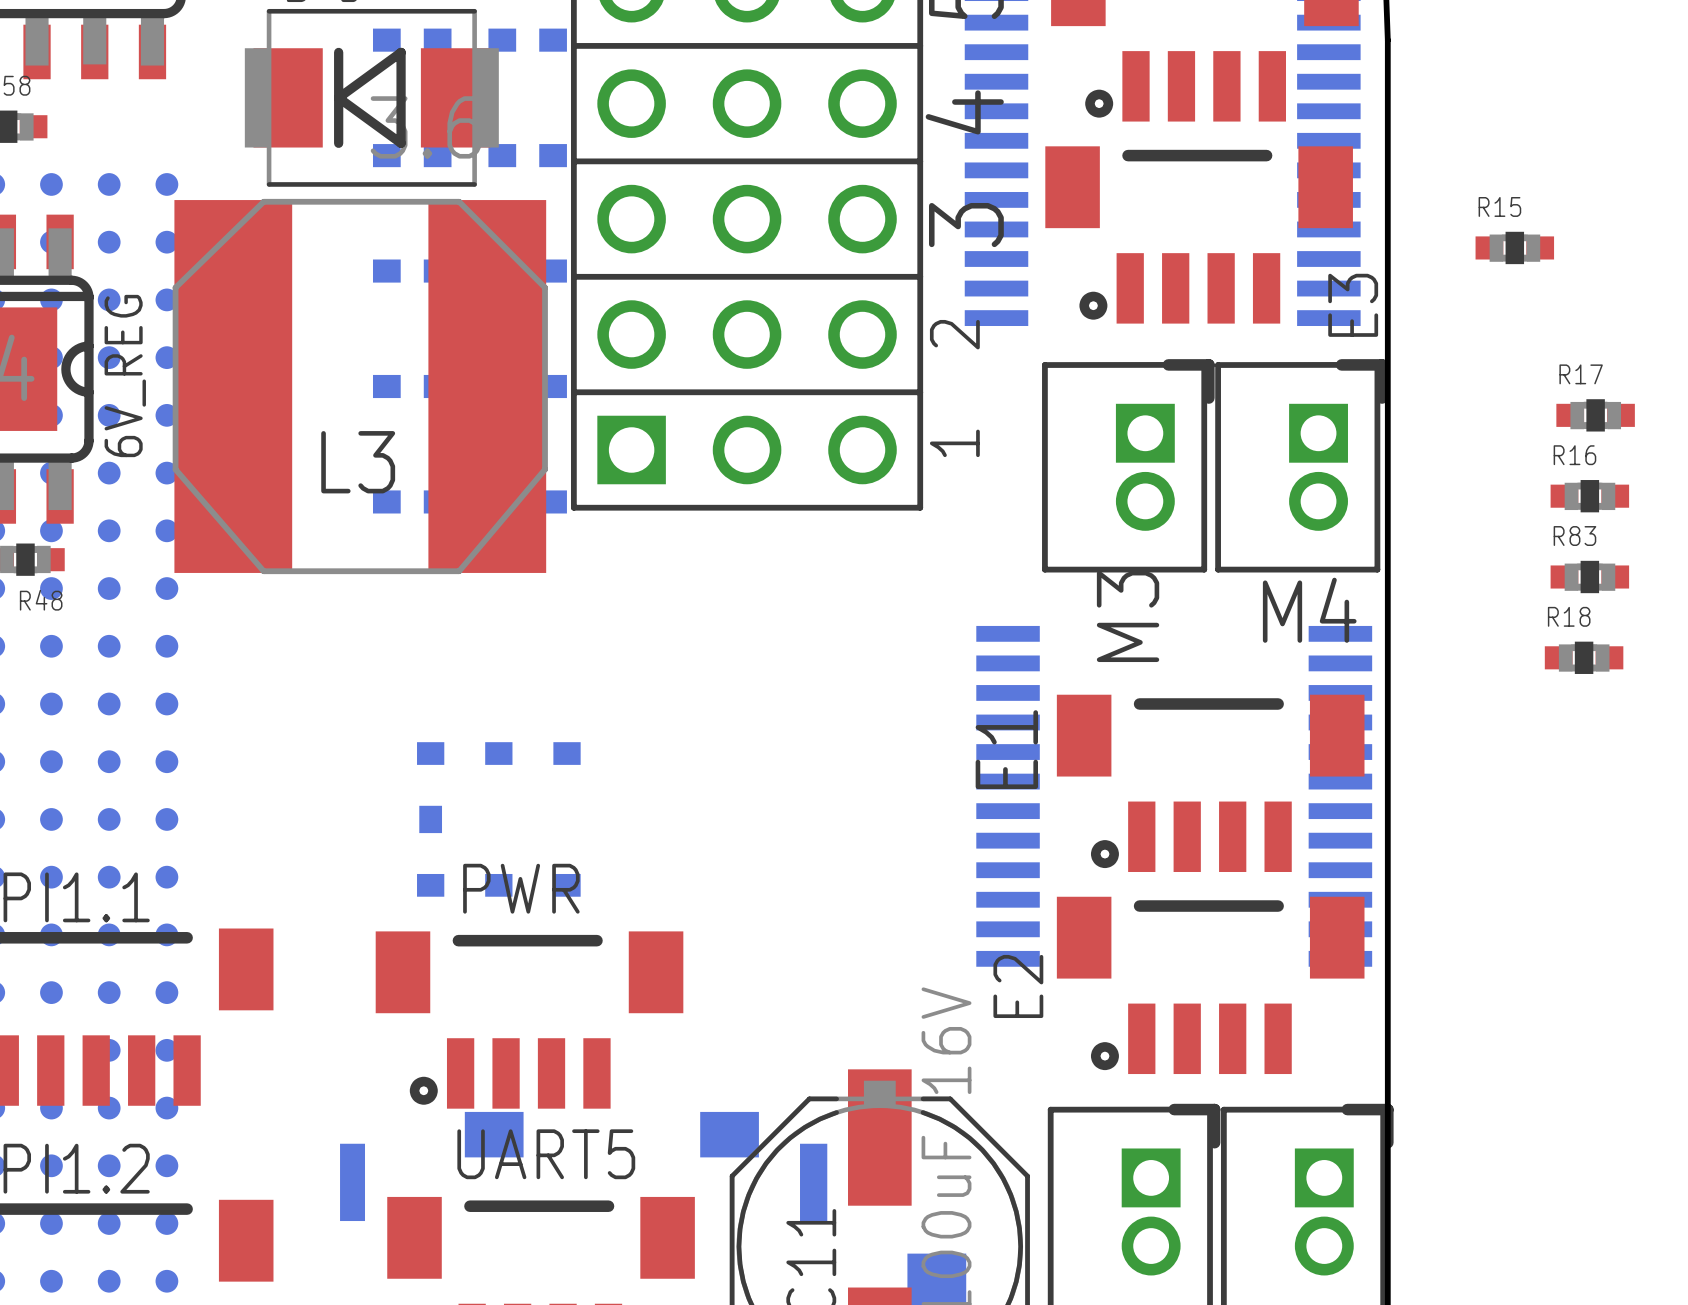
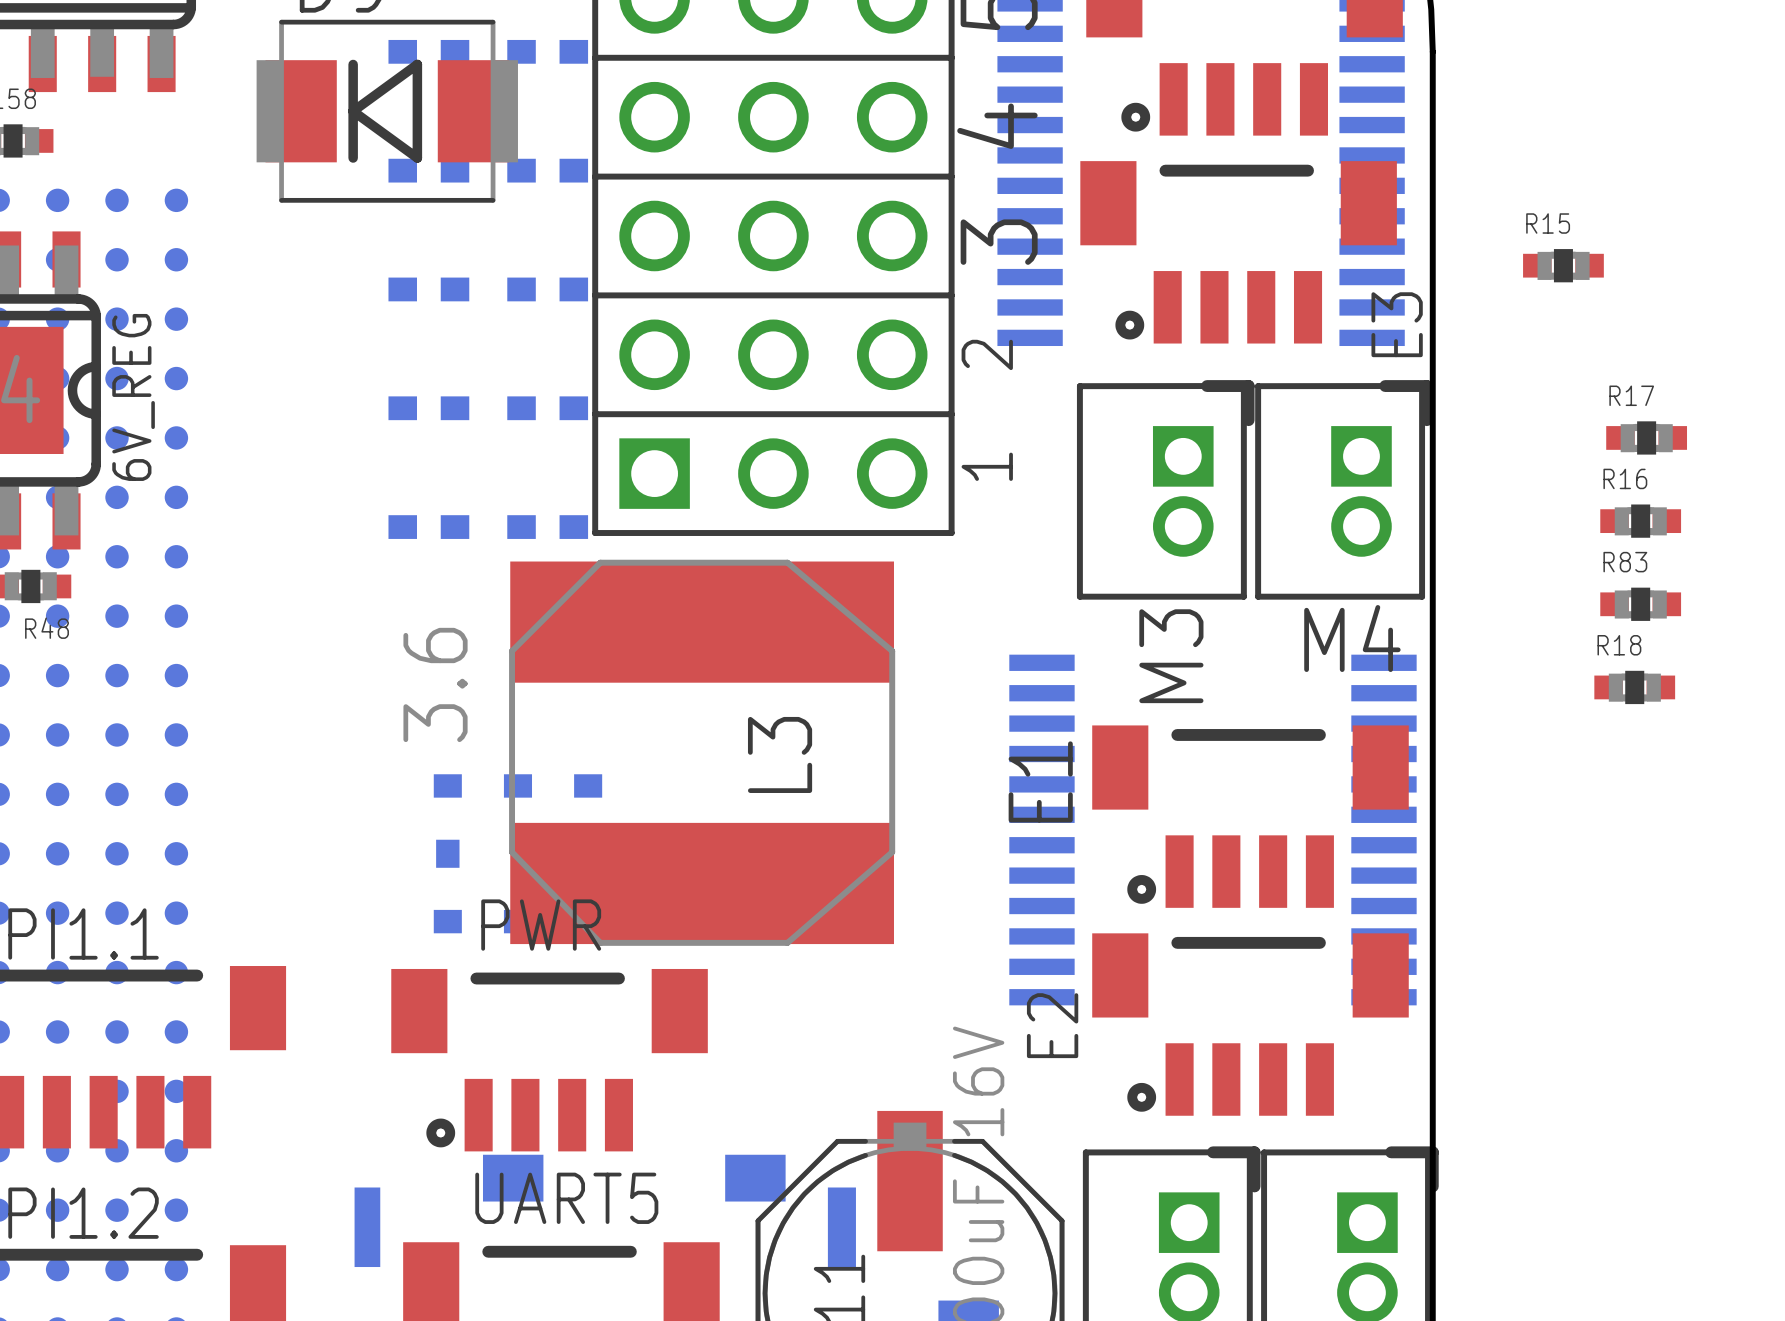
L3 rotation: 0° (360, 386) -> 90° counterclockwise (702, 752)
L3 position: (360, 386) -> (702, 752)
M3 name position: M3 (1128, 616) -> M3 (1171, 656)

